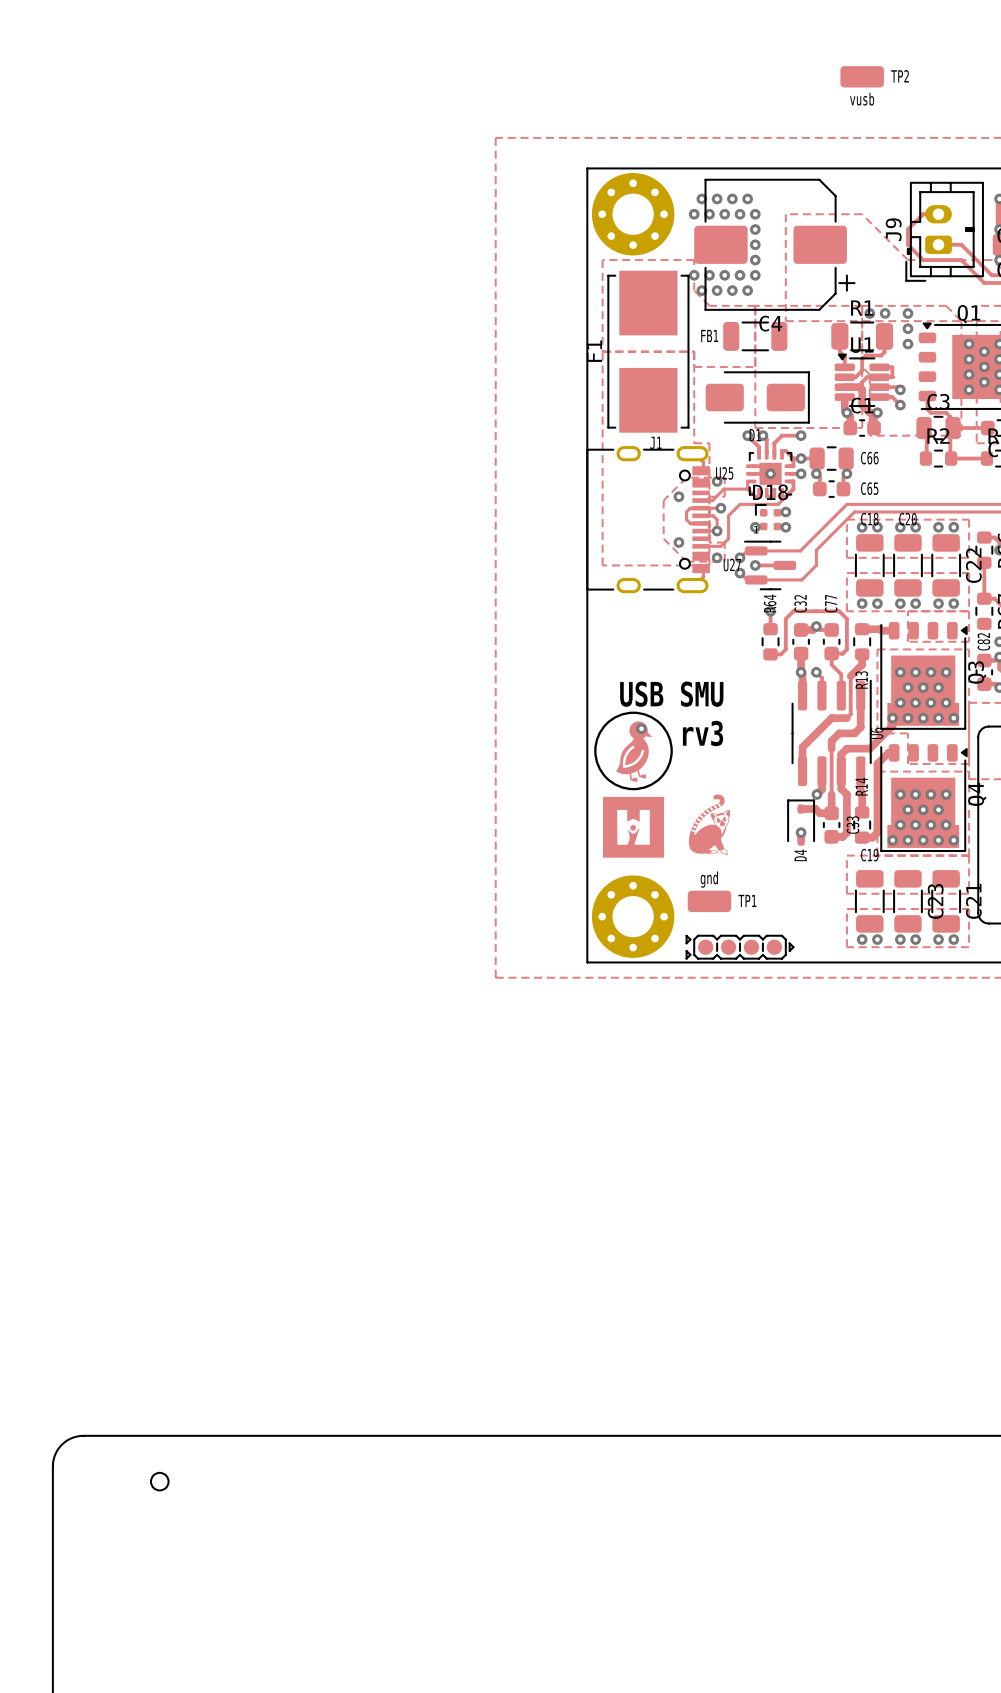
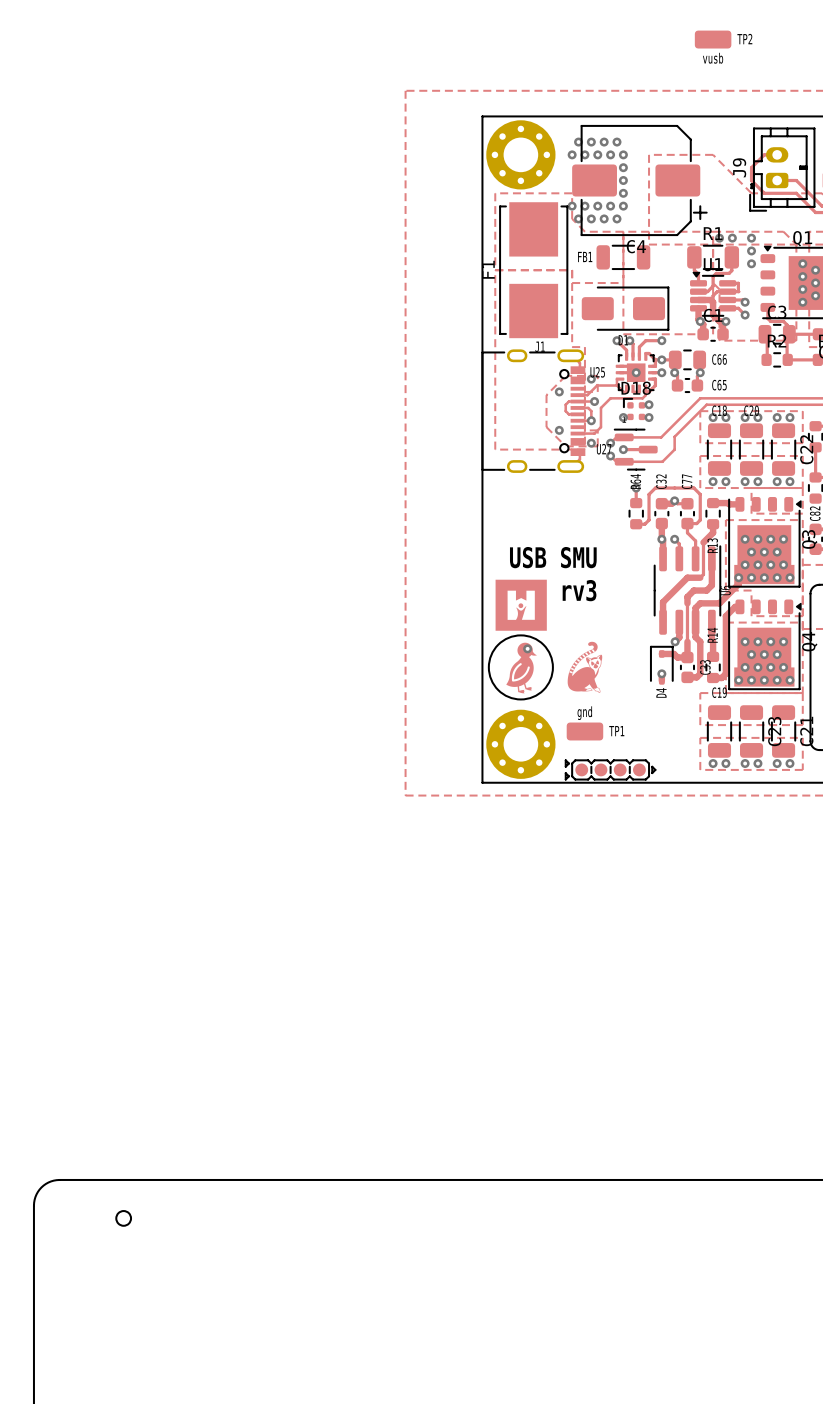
part footprint: [594, 711, 673, 791] -> [495, 579, 547, 631]
via position: (641, 728) -> (527, 648)
part footprint: [602, 796, 665, 858] -> [487, 634, 554, 701]

